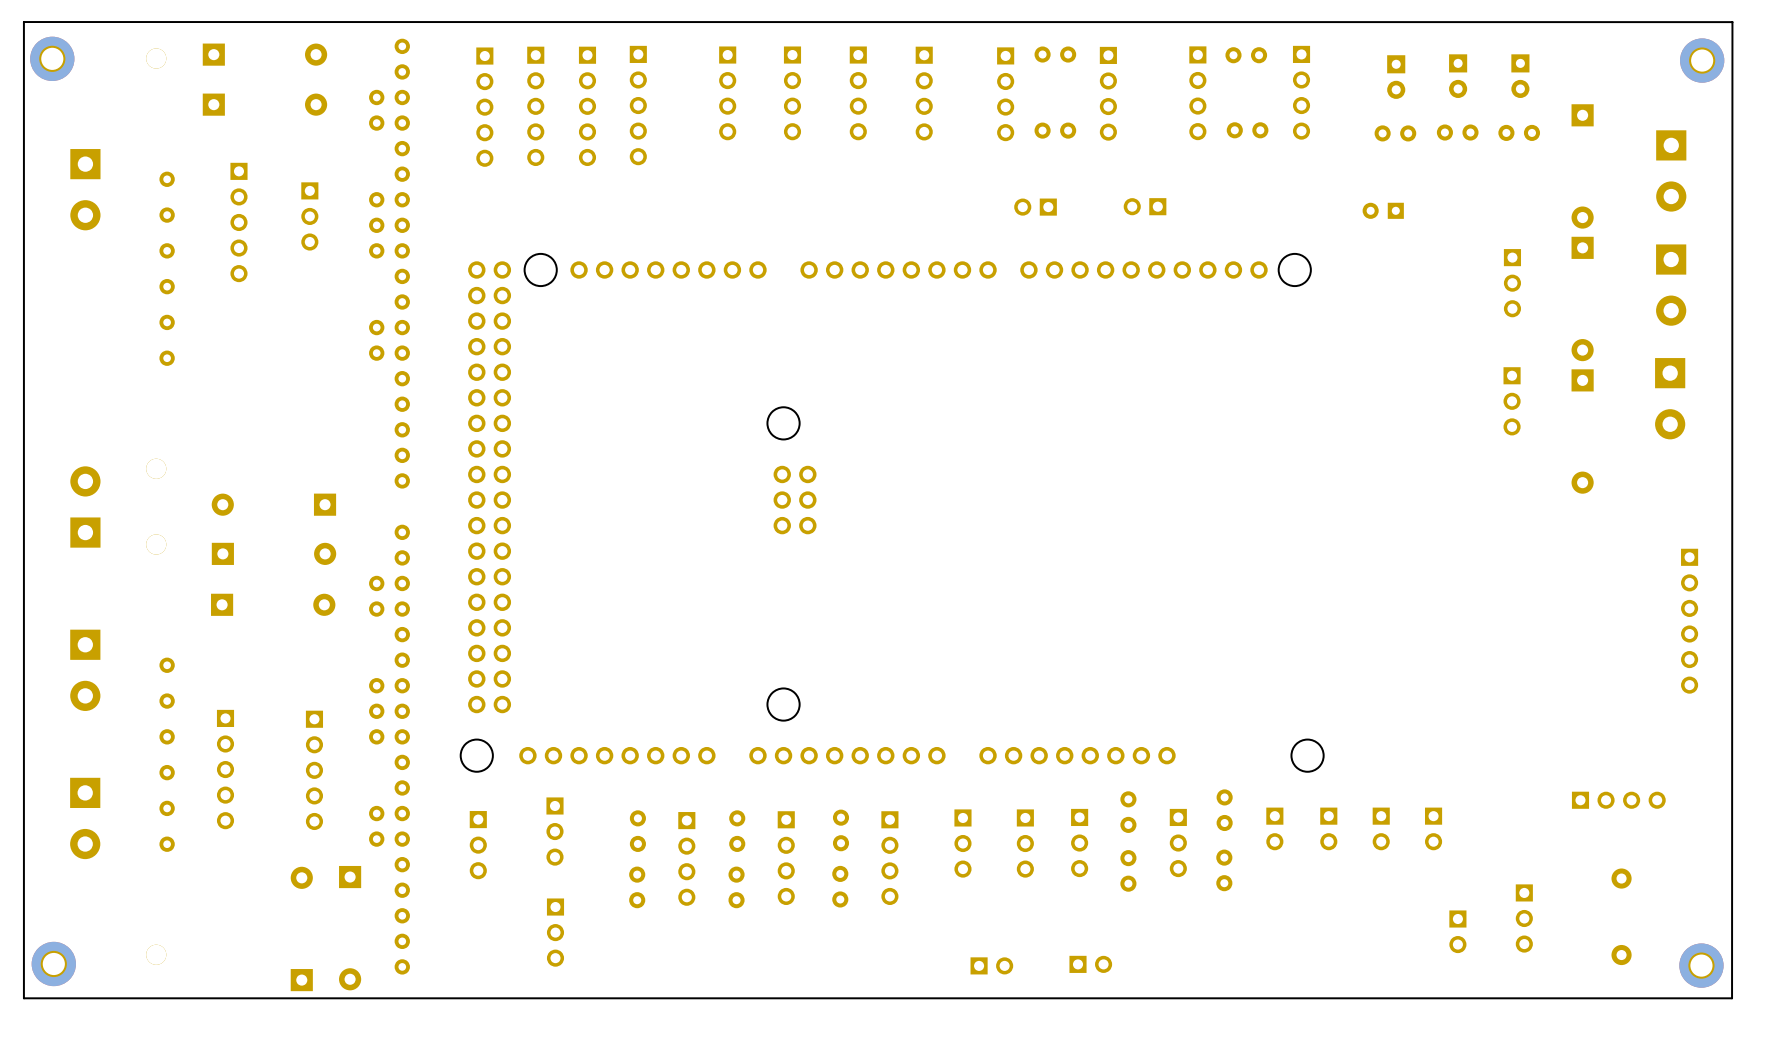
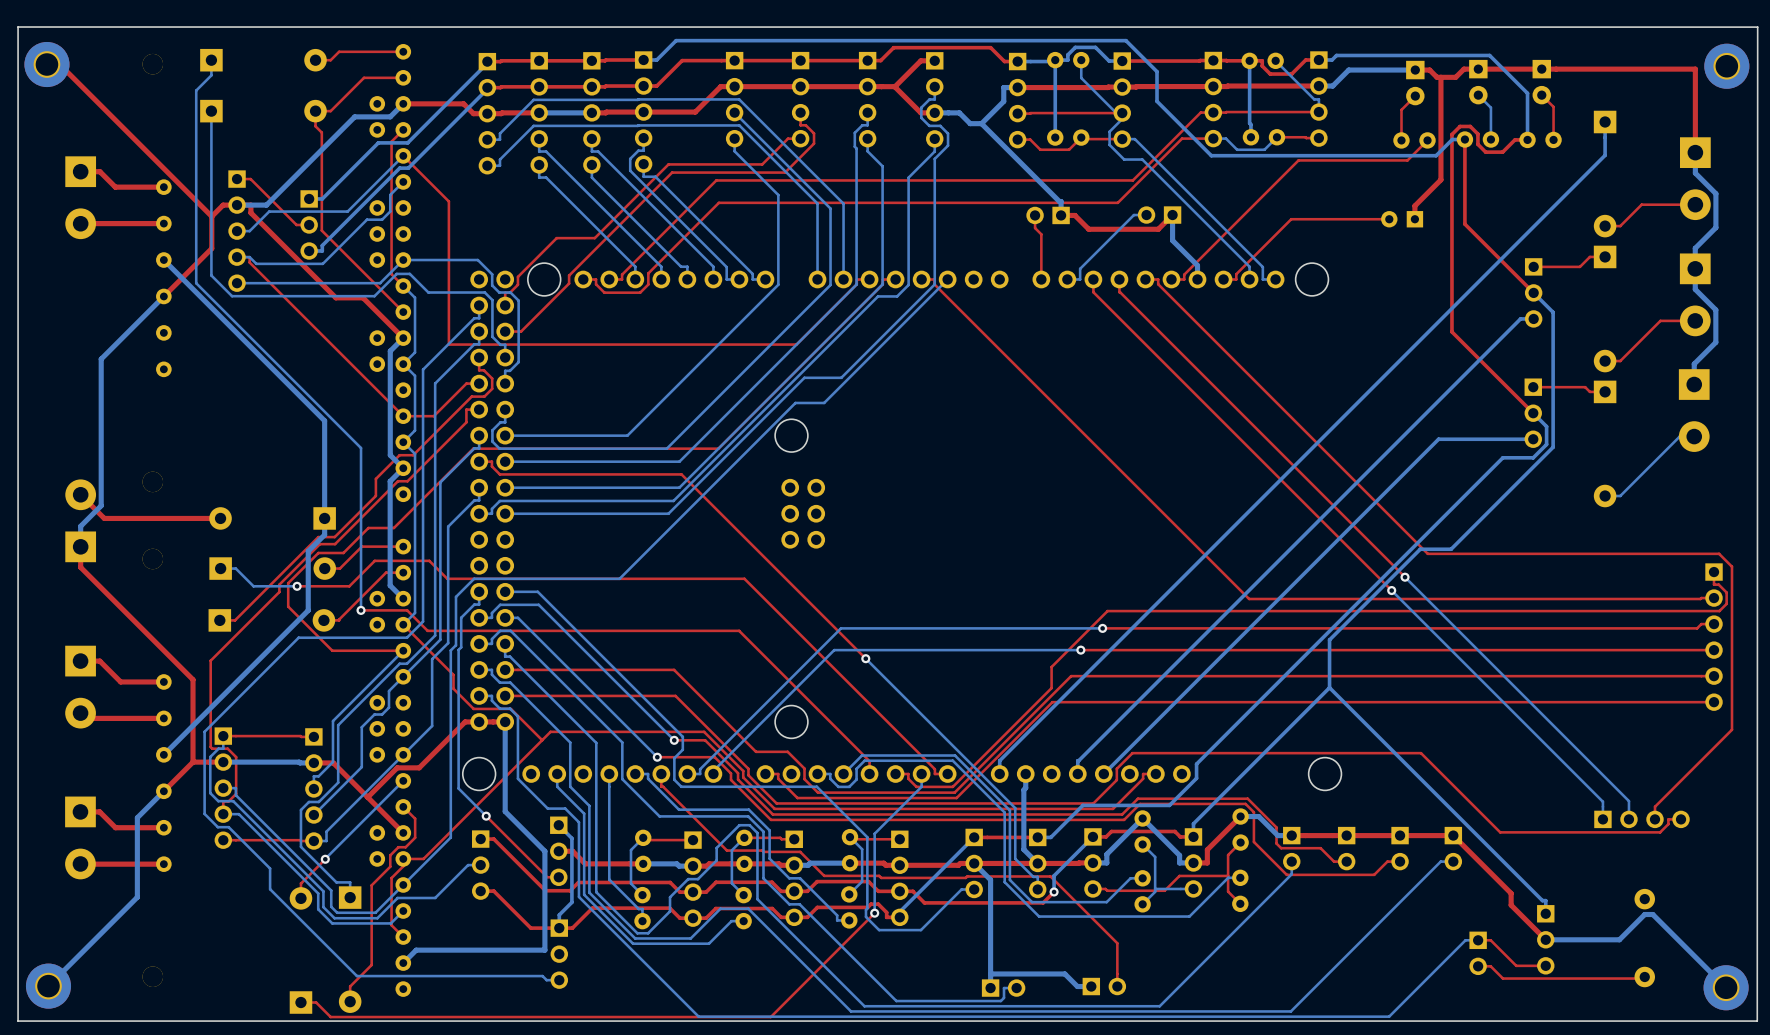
top track: none -> (403, 51) (339, 51) (330, 60) (315, 60)
bottom track: none -> (211, 60) (211, 75) (196, 90) (196, 283) (361, 448) (361, 610)
top track: none -> (643, 60) (487, 61)
bottom track: none -> (643, 60) (656, 60) (676, 40) (1125, 40) (1157, 71) (1157, 101) (1211, 155) (1436, 155) (1452, 139) (1464, 139)
bottom track: none -> (1081, 60) (1081, 78) (1122, 119)
top track: none -> (1318, 60) (1305, 60) (1291, 74) (1270, 74) (1262, 66) (1262, 60) (1122, 61)
bottom track: none -> (1318, 60) (1332, 60) (1336, 55) (1489, 55) (1527, 93) (1527, 139)
top track: none -> (934, 60) (920, 60) (894, 86)
top track: none -> (1017, 61) (1004, 61) (990, 47) (893, 47) (880, 60) (682, 60) (656, 86) (487, 87)
bottom track: none -> (1055, 61) (1017, 61)
bottom track: none -> (1122, 61) (1109, 61) (1095, 47) (1075, 47) (1067, 54) (1067, 60) (1055, 60) (1055, 137)
bottom track: none -> (1249, 60) (1250, 137)
bottom track: none -> (1275, 60) (1314, 99) (1318, 99) (1318, 112)
bottom track: none -> (487, 61) (407, 142) (378, 142) (322, 198) (309, 198)
top track: none -> (46, 64) (59, 64) (211, 216)
top track: none -> (1415, 70) (1429, 70) (1437, 77) (1455, 77) (1463, 69) (1695, 69) (1695, 152)
bottom track: none -> (1415, 70) (1348, 70) (1332, 86) (1318, 86)
top track: none -> (403, 77) (364, 77) (330, 111) (315, 111) (315, 126) (321, 132) (321, 230) (403, 312)
top track: none -> (1440, 77) (1440, 179) (1414, 205) (1414, 219)
top track: none -> (1318, 86) (1017, 87)
bottom track: none -> (934, 86) (934, 99) (929, 99) (921, 107) (921, 117) (929, 125) (940, 125) (948, 133) (948, 145) (934, 158) (934, 284) (841, 377) (804, 377) (668, 513) (505, 513)
bottom track: none -> (487, 87) (408, 168) (399, 168) (322, 245) (322, 251) (309, 251)
bottom track: none -> (1017, 87) (1003, 87) (1003, 101) (981, 123)
bottom track: none -> (1478, 95) (1490, 107) (1490, 139)
top track: none -> (1541, 95) (1553, 106) (1553, 139)
top track: none -> (1415, 96) (1401, 109) (1401, 140)
top track: none -> (403, 103) (463, 103) (473, 113) (539, 112)
bottom track: none -> (403, 103) (390, 116) (354, 116) (266, 205) (237, 205)
bottom track: none -> (211, 111) (211, 275) (232, 296) (374, 296) (396, 273) (409, 273) (428, 292) (484, 292) (492, 300) (492, 336) (500, 344) (505, 344) (505, 357)
top track: none -> (1318, 112) (1200, 112) (1132, 180) (716, 180) (622, 274) (622, 279) (609, 279)
bottom track: none -> (591, 112) (539, 112)
bottom track: none -> (734, 112) (830, 208) (830, 284) (666, 448) (499, 448) (492, 441) (492, 430) (500, 422) (505, 422) (505, 409)
top track: none -> (800, 112) (800, 125) (805, 125) (814, 133) (814, 143) (785, 172) (672, 172) (569, 275) (569, 283) (521, 331) (505, 331)
bottom track: none -> (867, 112) (867, 125) (862, 125) (854, 132) (854, 146) (856, 148) (856, 284) (679, 461) (505, 461)
top track: none -> (934, 112) (920, 112) (894, 86) (720, 86) (695, 112) (591, 112)
bottom track: none -> (934, 112) (959, 112) (970, 123) (981, 123)
top track: none -> (1122, 113) (1017, 113)
bottom track: none -> (1122, 119) (1109, 131) (1109, 144) (1124, 159) (1142, 159) (1249, 266) (1249, 279)
bottom track: none -> (1605, 122) (1605, 155) (999, 760) (999, 774)
bottom track: none -> (981, 123) (1061, 201) (1061, 215)
top track: none -> (403, 129) (391, 141) (391, 274) (403, 286)
top track: none -> (1276, 137) (1318, 138)
bottom track: none -> (1276, 137) (1264, 149) (1237, 149) (1225, 138) (1213, 138)
bottom track: none -> (539, 138) (539, 151) (546, 151) (661, 266) (661, 279)
bottom track: none -> (591, 138) (591, 151) (598, 151) (713, 266) (713, 279)
bottom track: none -> (643, 138) (643, 150) (638, 150) (630, 158) (630, 170) (726, 267) (726, 279) (739, 279)
bottom track: none -> (734, 138) (734, 151) (778, 195) (778, 284) (627, 435) (505, 435)
top track: none -> (800, 138) (788, 138) (762, 164) (668, 164) (594, 238) (556, 238) (517, 276) (517, 284) (509, 292) (505, 292) (505, 305)
bottom track: none -> (867, 138) (867, 151) (882, 166) (882, 284) (679, 487) (505, 487)
bottom track: none -> (934, 138) (934, 151) (908, 177) (908, 284) (897, 296) (878, 296) (673, 500) (499, 500) (491, 508) (491, 513) (479, 513)
top track: none -> (1213, 138) (1182, 138) (1117, 202) (718, 202) (648, 273) (648, 284) (640, 292) (604, 292) (596, 284) (596, 279) (583, 279)
bottom track: none -> (487, 139) (499, 139) (499, 133) (533, 99) (739, 99) (843, 203) (843, 279)
top track: none -> (1122, 139) (1081, 137) (1069, 149) (1040, 149) (1030, 139) (1017, 139)
bottom track: none -> (1122, 139) (1134, 139) (1262, 267) (1262, 279) (1275, 279)
top track: none -> (1464, 139) (1464, 224) (1533, 292)
top track: none -> (1527, 139) (1514, 139) (1502, 152) (1485, 152) (1477, 144) (1477, 134) (1470, 126) (1460, 126) (1451, 134) (1451, 331) (1533, 413)
top track: none -> (1427, 140) (1407, 160) (1298, 160) (1184, 274) (1184, 279) (1171, 279)
bottom track: none -> (1695, 152) (1695, 173) (1715, 193) (1715, 227) (1695, 248) (1695, 289) (1715, 309) (1715, 342) (1694, 363) (1694, 384)
top track: none -> (403, 155) (448, 201) (448, 344) (796, 344) (856, 284) (856, 279) (869, 279)
bottom track: none -> (403, 155) (347, 211) (269, 211) (249, 231) (237, 231)
bottom track: none -> (643, 164) (643, 176) (655, 176) (752, 273) (752, 279) (765, 279)
bottom track: none -> (539, 164) (539, 177) (546, 177) (635, 266) (635, 279)
bottom track: none -> (591, 164) (591, 177) (681, 266) (687, 266) (687, 279)
bottom track: none -> (487, 165) (499, 165) (499, 159) (533, 125) (739, 125) (817, 203) (817, 279)
top track: none -> (80, 171) (99, 171) (115, 187) (163, 187)
top track: none -> (237, 179) (250, 179) (296, 224) (309, 224)
bottom track: none -> (403, 181) (390, 194) (390, 211) (382, 219) (366, 219) (322, 263) (256, 263) (249, 257) (237, 257)
top track: none -> (1695, 204) (1641, 204) (1620, 226) (1605, 226)
bottom track: none -> (1146, 215) (1133, 215) (1080, 268) (1080, 279) (1067, 279)
top track: none -> (1172, 215) (1158, 229) (1088, 229) (1074, 215) (1061, 215)
bottom track: none -> (1172, 215) (1172, 240) (1197, 265) (1197, 279)
top track: none -> (1035, 215) (1035, 228) (1041, 234) (1041, 279)
top track: none -> (211, 216) (211, 248) (163, 296)
top track: none -> (211, 216) (223, 205) (250, 205) (250, 212) (335, 297) (363, 297) (403, 338)
top track: none -> (1389, 219) (1291, 219) (1236, 274) (1236, 279) (1223, 279)
top track: none -> (163, 223) (80, 223)
top track: none -> (1605, 256) (1589, 256) (1579, 266) (1533, 266)
top track: none -> (237, 257) (249, 257) (249, 262) (403, 416) (433, 416) (466, 383) (479, 383)
bottom track: none -> (163, 260) (324, 420) (324, 534) (308, 551) (308, 610) (163, 754)
top track: none -> (895, 279) (882, 279) (882, 284) (718, 448) (473, 448) (393, 528) (368, 528) (343, 553) (318, 553) (288, 583) (288, 606) (332, 650) (403, 650)
top track: none -> (921, 279) (934, 279) (934, 284) (1249, 599) (1714, 598)
bottom track: none -> (947, 279) (824, 402) (795, 402) (619, 578) (474, 578) (456, 596) (456, 645) (450, 650) (450, 837) (375, 912) (337, 912) (331, 906) (331, 890) (235, 795) (235, 788) (223, 788)
top track: none -> (1093, 279) (1093, 292) (1391, 590)
top track: none -> (1119, 279) (1119, 292) (1405, 577)
top track: none -> (1145, 279) (1158, 279) (1158, 284) (1427, 553) (1719, 553) (1732, 566) (1732, 729) (1655, 806) (1655, 819)
bottom track: none -> (237, 283) (380, 283) (403, 260) (477, 260) (492, 274) (492, 285) (499, 292) (510, 292) (518, 300) (518, 362) (509, 370) (505, 370) (505, 383)
bottom track: none -> (403, 286) (415, 297) (415, 352) (403, 364) (415, 375) (415, 430) (403, 442) (415, 453) (415, 612) (403, 624)
bottom track: none -> (1533, 292) (1553, 312) (1553, 447) (1451, 549) (1420, 549) (1329, 639) (1329, 687)
bottom track: none -> (163, 296) (101, 359) (101, 505) (80, 526) (80, 546)
bottom track: none -> (479, 305) (479, 318) (474, 318) (423, 369) (423, 621) (406, 637) (298, 637) (204, 731) (204, 813) (217, 827) (228, 827) (270, 868) (270, 889) (356, 976) (542, 976) (546, 980) (559, 980)
bottom track: none -> (1533, 318) (1520, 318) (1077, 760) (1077, 774)
top track: none -> (1695, 320) (1660, 320) (1620, 361) (1605, 361)
bottom track: none -> (479, 331) (479, 344) (474, 344) (435, 383) (435, 635) (406, 663) (399, 663) (338, 725) (338, 782) (318, 801) (308, 801) (300, 810) (300, 846) (336, 882) (350, 882) (350, 897)
bottom track: none -> (403, 338) (390, 351) (390, 455) (403, 468) (390, 481) (390, 585) (403, 598)
top track: none -> (479, 357) (479, 370) (483, 370) (492, 378) (492, 388) (484, 396) (471, 396) (413, 455) (399, 455) (375, 478) (375, 495) (334, 537) (318, 537) (235, 620) (219, 620)
top track: none -> (1533, 387) (1585, 387) (1589, 391) (1605, 391)
top track: none -> (479, 409) (466, 409) (466, 422) (407, 481) (397, 481) (335, 544) (319, 544) (279, 584) (279, 592) (210, 660) (210, 747) (212, 748) (227, 748) (236, 757) (236, 793) (228, 801) (223, 801) (223, 814)
bottom track: none -> (1533, 413) (1546, 426) (1546, 444) (1533, 457) (1502, 457) (1196, 764) (1196, 778) (1169, 805) (1082, 805) (1050, 837) (1037, 837)
bottom track: none -> (479, 435) (479, 448) (474, 448) (440, 482) (440, 639) (388, 691) (388, 707) (382, 714) (374, 714) (361, 727) (361, 767) (313, 814)
bottom track: none -> (1694, 436) (1679, 436) (1620, 496) (1605, 496)
bottom track: none -> (1533, 439) (1438, 439) (1103, 774)
top track: none -> (479, 461) (491, 461) (491, 466) (499, 474) (681, 474) (865, 658)
bottom track: none -> (479, 487) (479, 500) (474, 500) (448, 526) (448, 643) (432, 659) (432, 726) (326, 831) (326, 841) (313, 841)
top track: none -> (80, 494) (104, 518) (220, 518)
top track: none -> (80, 546) (80, 567) (193, 679) (193, 762)
top track: none -> (403, 546) (361, 546) (339, 568) (324, 568)
bottom track: none -> (220, 568) (235, 568) (253, 586) (297, 586)
top track: none -> (403, 572) (386, 572) (339, 620) (323, 620)
top track: none -> (1714, 572) (1714, 584) (1718, 584) (1726, 592) (1726, 603) (1719, 611) (1107, 611) (1051, 667) (1051, 688) (952, 786) (916, 786) (908, 778) (908, 774) (895, 774)
bottom track: none -> (1405, 577) (1628, 801) (1628, 819)
via: none -> (1405, 577)
top track: none -> (297, 586) (349, 586) (374, 560) (429, 560) (447, 578) (744, 578) (934, 769) (934, 774) (947, 774)
via: none -> (297, 586)
bottom track: none -> (1391, 590) (1602, 801) (1602, 819)
via: none -> (1391, 590)
bottom track: none -> (479, 591) (479, 604) (474, 604) (461, 617) (461, 647) (458, 649) (458, 788) (486, 816)
bottom track: none -> (505, 591) (537, 591) (682, 736) (682, 749) (674, 758) (674, 779) (681, 786) (816, 786) (867, 837) (865, 916) (879, 930) (920, 930) (961, 889) (974, 889)
top track: none -> (361, 610) (407, 610) (427, 630) (739, 630) (869, 761) (869, 774)
via: none -> (361, 610)
bottom track: none -> (479, 617) (491, 617) (491, 613) (500, 604) (538, 604) (674, 740)
bottom track: none -> (505, 617) (517, 617) (657, 757)
top track: none -> (1714, 624) (1701, 624) (1697, 628) (1102, 628)
top track: none -> (403, 624) (453, 674) (453, 688) (473, 708) (510, 708) (542, 740)
bottom track: none -> (1102, 628) (840, 628) (700, 769) (700, 774) (687, 774)
via: none -> (1102, 628)
bottom track: none -> (479, 643) (491, 643) (491, 639) (500, 630) (510, 630) (622, 742) (622, 779) (659, 816) (748, 816) (763, 831) (763, 878) (789, 904) (799, 904) (896, 1001) (1000, 1001) (1004, 997) (1004, 988) (1016, 988)
bottom track: none -> (505, 643) (505, 656) (509, 656) (596, 742) (596, 892) (637, 933) (648, 933) (670, 911) (670, 897) (688, 879) (698, 879) (716, 860) (716, 848) (739, 825) (749, 825) (757, 833) (757, 899) (864, 1006) (1159, 1006) (1291, 874) (1291, 861)
bottom track: none -> (1080, 650) (834, 650) (713, 770) (713, 774)
via: none -> (1080, 650)
top track: none -> (1714, 650) (1080, 650)
bottom track: none -> (403, 650) (332, 721) (332, 761) (318, 776) (313, 776) (313, 788)
bottom track: none -> (865, 658) (1015, 808) (1015, 858) (1033, 876) (1037, 876) (1037, 889)
via: none -> (865, 658)
top track: none -> (80, 661) (99, 661) (120, 681) (163, 681)
bottom track: none -> (479, 669) (491, 669) (491, 674) (499, 682) (510, 682) (570, 742) (570, 786) (589, 805) (589, 892) (635, 938) (690, 938) (720, 908) (748, 908) (851, 1011) (1290, 1011) (1440, 861) (1453, 861)
top track: none -> (505, 669) (674, 669) (756, 751) (787, 751) (804, 768) (804, 779) (817, 792) (954, 792) (1071, 676) (1714, 676)
bottom track: none -> (1329, 687) (1542, 900) (1545, 900) (1545, 913)
bottom track: none -> (1329, 687) (1193, 823) (1193, 836)
bottom track: none -> (479, 695) (491, 695) (491, 700) (499, 708) (510, 708) (517, 716) (517, 778) (547, 808) (565, 808) (578, 822) (578, 896) (698, 1016) (1389, 1016) (1465, 940) (1478, 940)
top track: none -> (505, 695) (675, 695) (748, 768) (748, 775) (776, 803) (1093, 803) (1116, 780) (1116, 768) (1132, 753) (1421, 753) (1500, 832) (1660, 832) (1668, 824) (1668, 819) (1681, 819)
top track: none -> (1714, 702) (1052, 702) (956, 798) (797, 798) (778, 778) (778, 774) (765, 774)
top track: none -> (80, 713) (85, 718) (163, 718)
top track: none -> (505, 721) (465, 721) (419, 767) (397, 767) (367, 797)
bottom track: none -> (505, 721) (505, 811) (544, 851) (544, 950) (416, 950) (403, 963)
top track: none -> (223, 736) (313, 736)
bottom track: none -> (223, 736) (223, 748) (218, 748) (210, 756) (210, 793) (218, 801) (233, 801) (323, 891) (323, 907) (334, 918) (377, 918) (397, 897) (435, 897) (468, 865) (480, 865)
top track: none -> (674, 740) (705, 740) (738, 773) (738, 779) (772, 814) (1122, 814) (1137, 798) (1247, 798) (1276, 827) (1276, 843) (1281, 848) (1320, 848) (1334, 861) (1346, 861)
via: none -> (674, 740)
top track: none -> (657, 757) (714, 757) (731, 773) (731, 779) (770, 819) (1124, 819) (1140, 803) (1245, 803) (1253, 812) (1253, 841) (1286, 874) (1374, 874) (1387, 861) (1400, 861)
via: none -> (657, 757)
top track: none -> (193, 762) (163, 791)
top track: none -> (223, 762) (193, 762)
bottom track: none -> (223, 762) (313, 762)
top track: none -> (313, 762) (333, 762) (403, 832)
bottom track: none -> (557, 774) (557, 786) (584, 813) (584, 894) (633, 943) (708, 943) (731, 921) (743, 921)
bottom track: none -> (609, 774) (609, 879) (638, 909) (642, 909) (642, 921)
bottom track: none -> (635, 774) (648, 774) (648, 778) (678, 809) (748, 809) (769, 830) (769, 858) (789, 878) (800, 878) (837, 915) (837, 920) (849, 920)
top track: none -> (661, 774) (661, 786) (726, 850) (800, 851) (824, 875) (879, 875) (881, 877) (1050, 876) (1117, 943) (1117, 986)
bottom track: none -> (817, 774) (830, 774) (830, 778) (838, 786) (849, 786) (856, 779) (856, 768) (864, 760) (952, 760) (1004, 812) (1004, 882) (1039, 916) (1189, 916) (1228, 877) (1240, 877)
bottom track: none -> (843, 774) (862, 755) (954, 755) (1009, 810) (1009, 879) (1032, 902) (1106, 902) (1130, 878) (1142, 878)
bottom track: none -> (921, 774) (921, 786) (874, 833) (874, 913)
bottom track: none -> (1025, 774) (1023, 849) (1037, 863)
top track: none -> (1155, 774) (1143, 774) (1143, 778) (1112, 808) (774, 808) (743, 777) (743, 771) (704, 731) (550, 731) (423, 858) (403, 858) (403, 866) (391, 878) (391, 925) (403, 937)
bottom track: none -> (403, 780) (325, 859)
bottom track: none -> (163, 791) (137, 817) (137, 897) (48, 986)
top track: none -> (403, 806) (415, 818) (415, 837) (405, 847) (398, 847) (390, 855) (390, 866) (371, 885) (371, 965) (350, 986) (350, 1001)
top track: none -> (80, 811) (99, 811) (115, 827) (163, 827)
bottom track: none -> (223, 814) (238, 814) (318, 893) (318, 909) (332, 923) (390, 923) (403, 911)
top track: none -> (486, 816) (546, 877) (558, 877)
via: none -> (486, 816)
top track: none -> (1240, 816) (1207, 849) (1207, 862) (1193, 862)
bottom track: none -> (1240, 816) (1258, 816) (1277, 835) (1291, 835)
bottom track: none -> (558, 825) (571, 838) (571, 902) (559, 914) (559, 928)
top track: none -> (1291, 835) (1453, 835) (1511, 893) (1511, 905) (1545, 939)
top track: none -> (850, 837) (852, 839) (899, 839)
bottom track: none -> (850, 837) (862, 849) (862, 881) (849, 894)
bottom track: none -> (974, 837) (899, 911) (899, 917)
top track: none -> (1037, 837) (974, 837)
bottom track: none -> (1092, 836) (1054, 875) (1054, 891)
top track: none -> (1193, 836) (1180, 836) (1174, 831) (1111, 831) (1106, 836) (1092, 836)
top track: none -> (643, 837) (645, 840) (693, 840)
bottom track: none -> (643, 837) (631, 850) (631, 883) (642, 895)
top track: none -> (744, 837) (794, 839)
bottom track: none -> (744, 837) (731, 850) (731, 883) (743, 895)
top track: none -> (480, 839) (493, 839) (545, 890) (570, 890) (578, 882) (670, 882) (679, 892) (706, 892) (716, 882) (772, 882) (781, 891) (807, 891) (817, 881) (868, 881) (878, 891) (912, 891) (924, 902) (1043, 902) (1054, 891)
top track: none -> (223, 840) (313, 841)
top track: none -> (1240, 842) (1228, 855) (1228, 891) (1240, 903)
bottom track: none -> (1142, 844) (1155, 857) (1155, 891) (1142, 904)
top track: none -> (558, 851) (572, 851) (585, 863) (643, 863)
top track: none -> (325, 859) (300, 883) (300, 898)
via: none -> (325, 859)
bottom track: none -> (643, 863) (676, 863) (679, 866) (693, 866)
bottom track: none -> (850, 863) (810, 863) (808, 865) (794, 865)
bottom track: none -> (974, 863) (990, 879) (990, 988)
top track: none -> (1092, 862) (960, 863) (958, 865) (850, 863)
bottom track: none -> (1193, 862) (1179, 862) (1179, 855) (1142, 818) (1106, 854) (1106, 862) (1092, 862)
top track: none -> (80, 863) (163, 864)
top track: none -> (794, 865) (709, 863) (706, 866) (693, 866)
top track: none -> (1228, 875) (1179, 875) (1164, 890) (1092, 888)
bottom track: none -> (1193, 888) (1155, 888)
top track: none -> (480, 891) (493, 891) (530, 928) (572, 928) (592, 908) (669, 908) (679, 918) (706, 918) (715, 908) (772, 908) (781, 917) (807, 917) (817, 907) (867, 907) (870, 904) (878, 904) (886, 912) (886, 917) (899, 917)
via: none -> (1054, 891)
top track: none -> (874, 913) (770, 1017) (330, 1017) (316, 1002) (300, 1002)
via: none -> (874, 913)
bottom track: none -> (1545, 939) (1619, 939) (1644, 914) (1652, 914) (1726, 987)
top track: none -> (1478, 940) (1490, 940) (1516, 965) (1545, 965)
top track: none -> (1478, 966) (1490, 966) (1502, 978) (1643, 978) (1644, 976)
bottom track: none -> (990, 973) (1064, 973) (1077, 986) (1091, 986)

